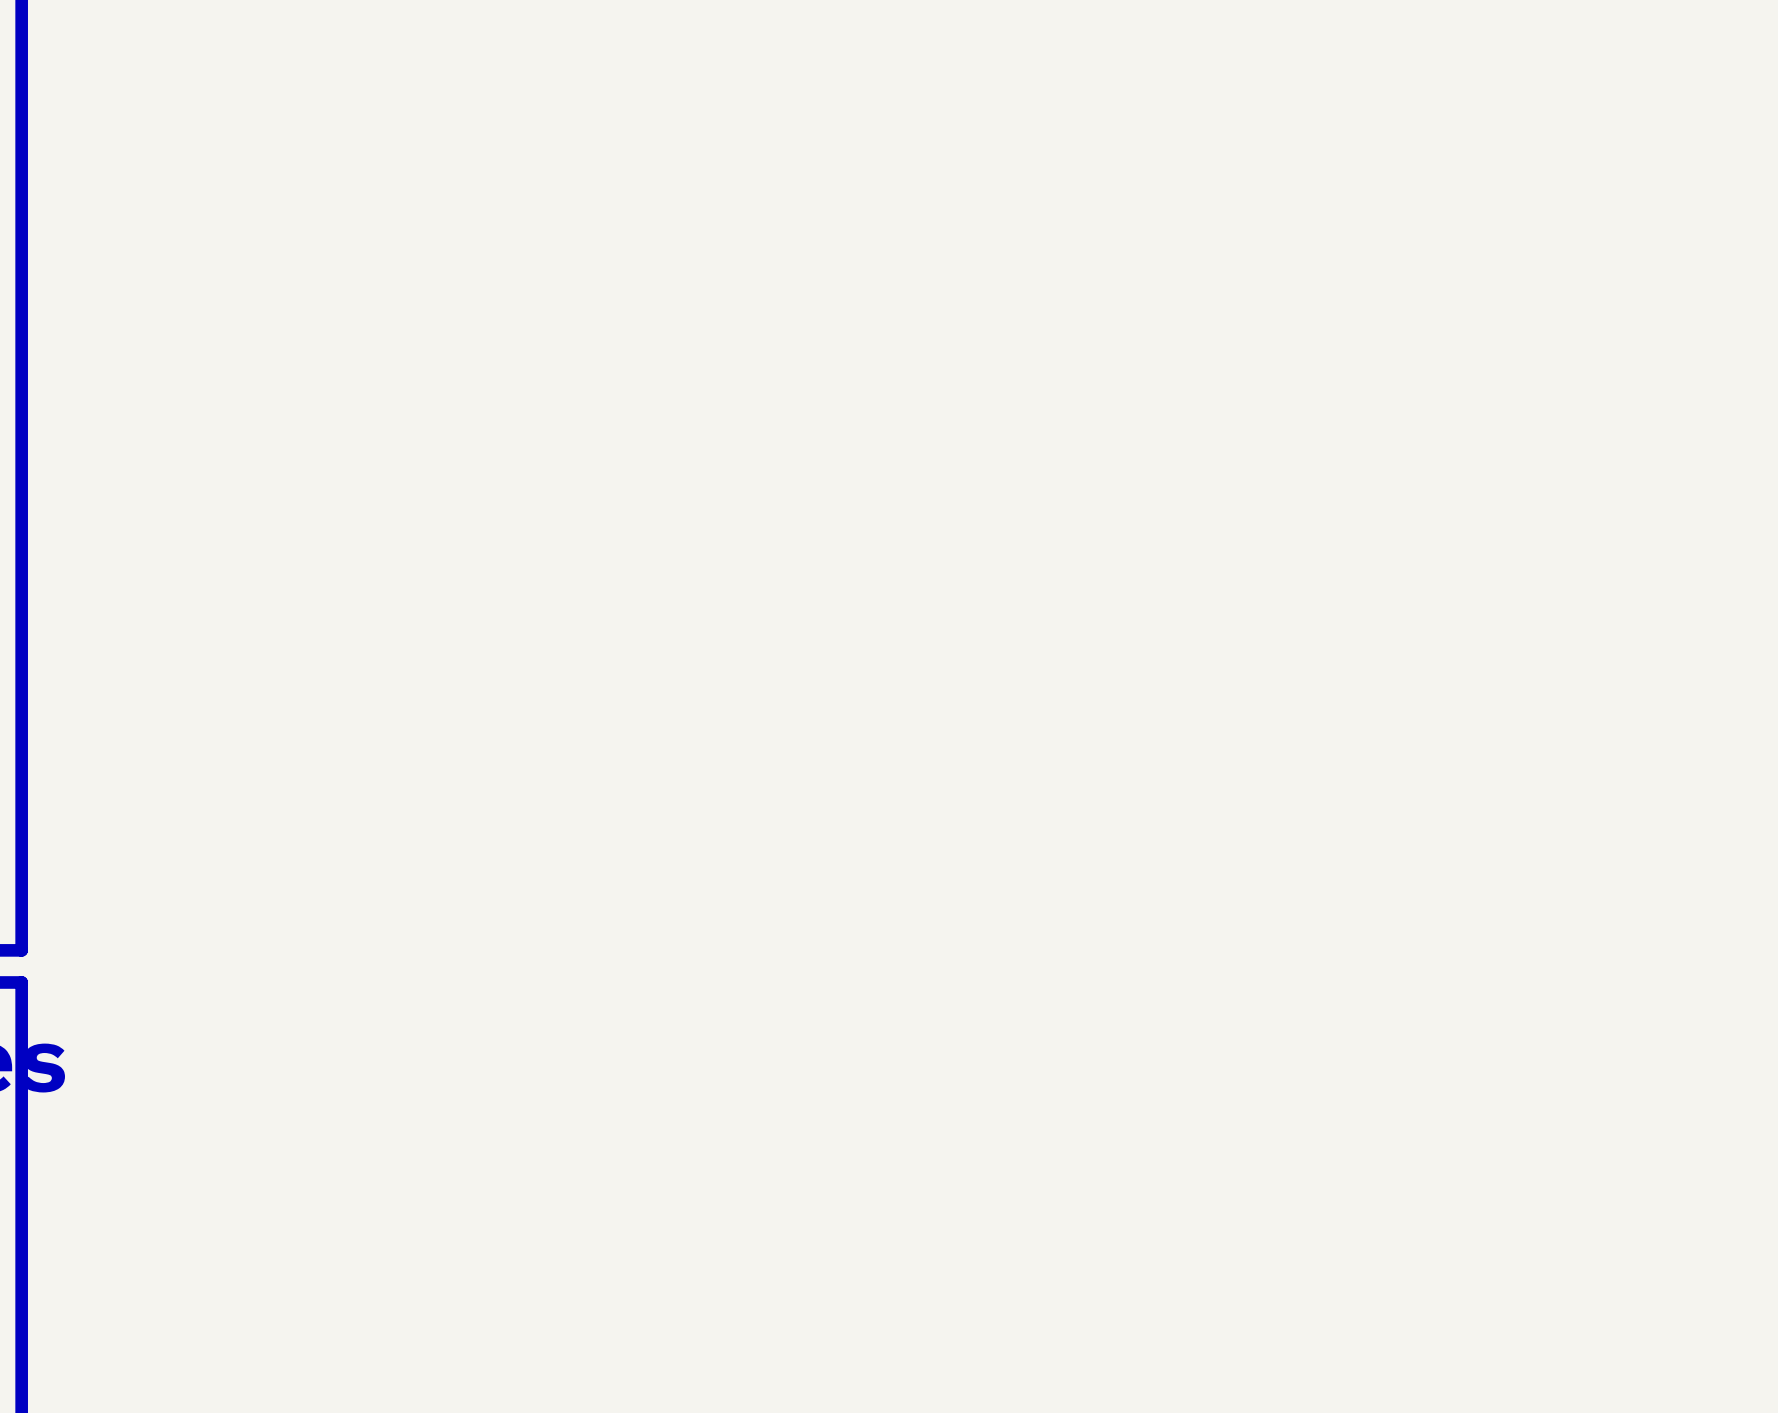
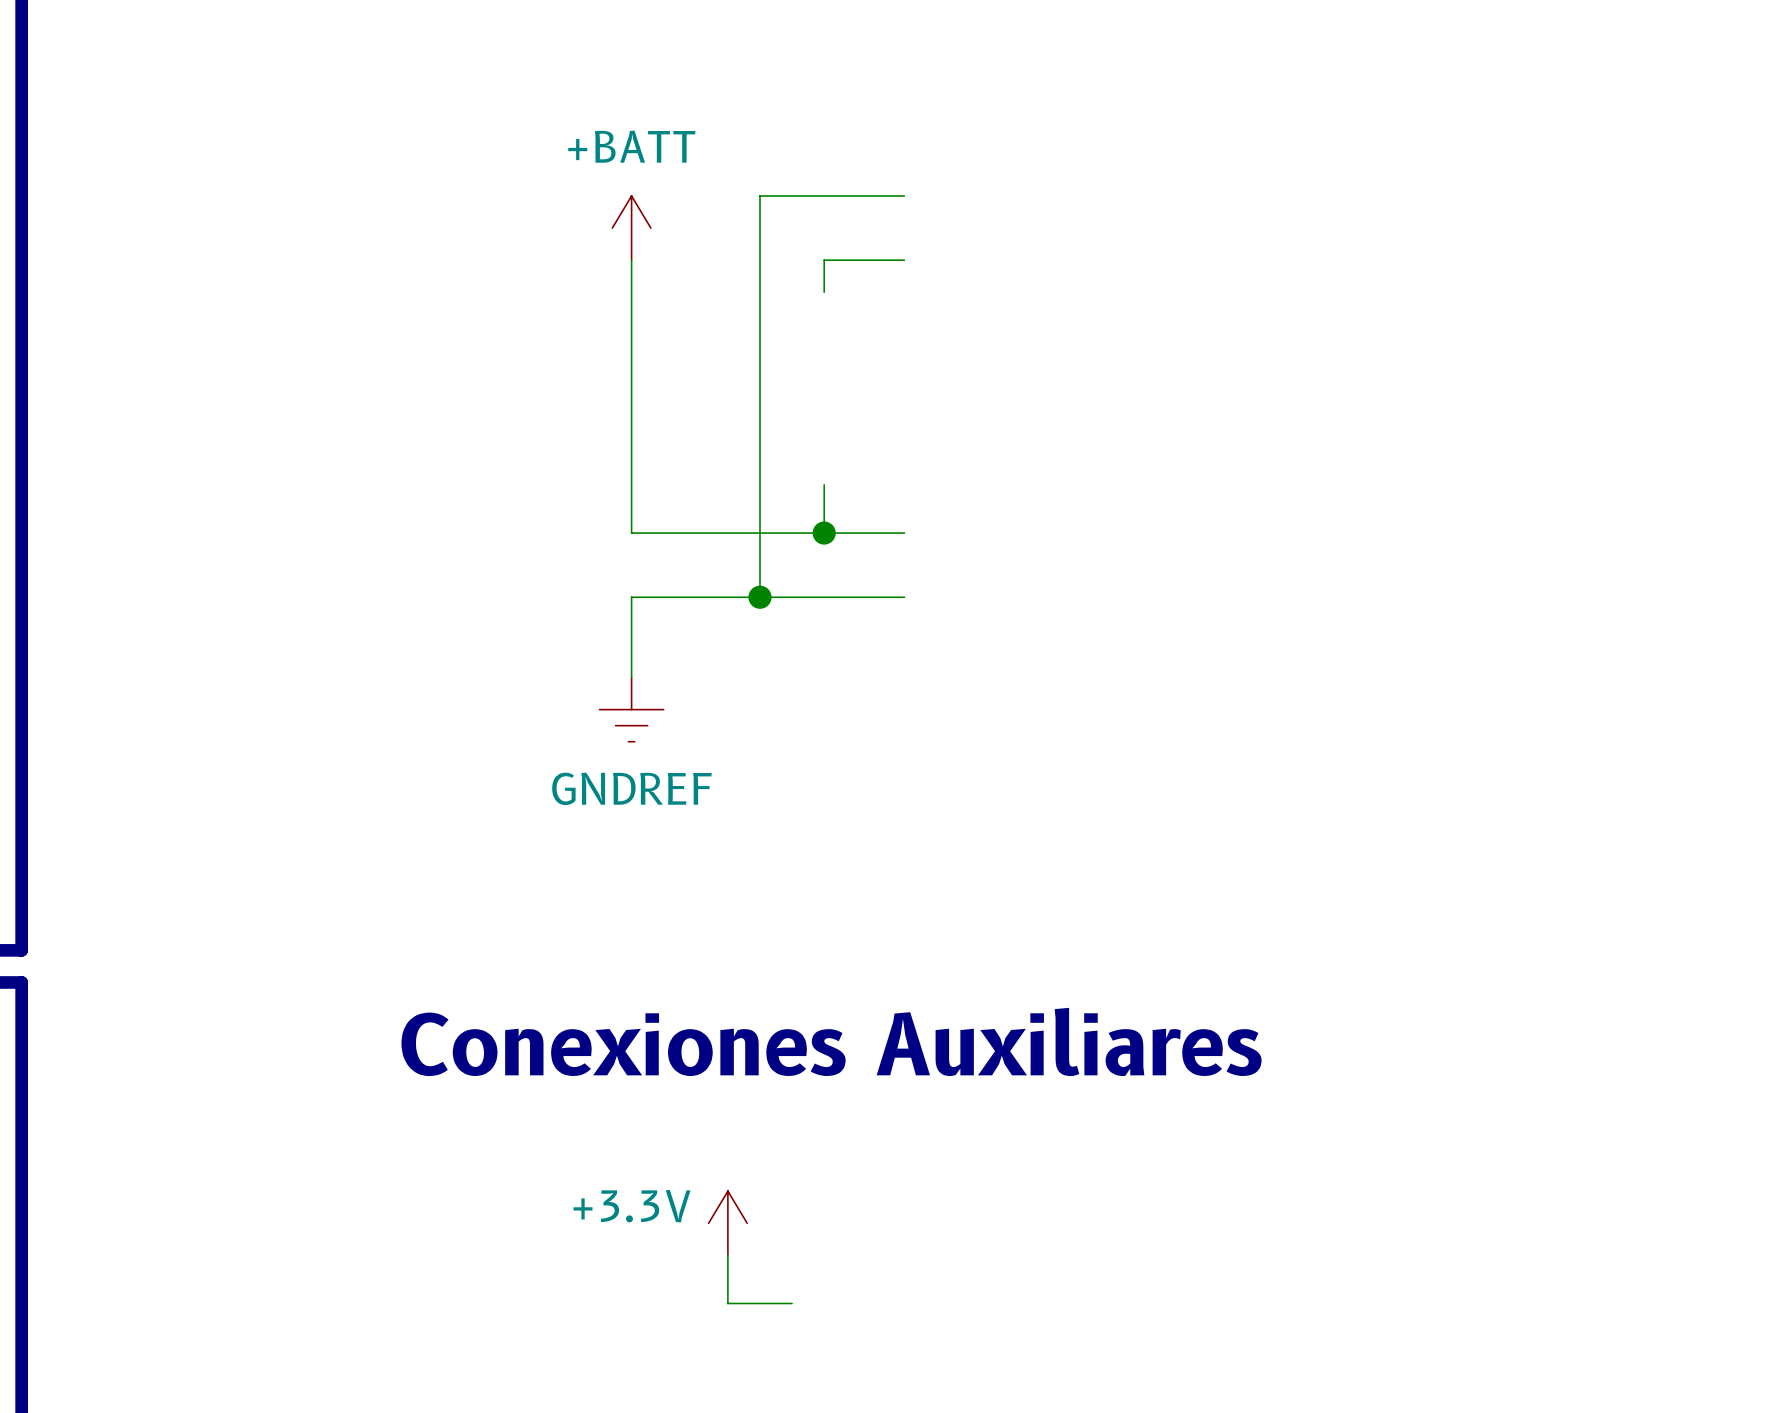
wire: none -> (904, 195) (759, 195) (759, 597)
power symbol: none -> +BATT (631, 228)
wire: none -> (631, 260) (631, 533) (904, 533)
wire: none -> (904, 260) (824, 260) (824, 292)
wire: none -> (824, 484) (824, 533)
junction: none -> (824, 533)
junction: none -> (759, 597)
wire: none -> (904, 597) (631, 597) (631, 677)
power symbol: none -> GNDREF (631, 709)
text: none -> Conexiones Auxiliares (831, 1041)
power symbol: none -> +3.3V (727, 1223)
wire: none -> (727, 1255) (727, 1303) (792, 1303)

